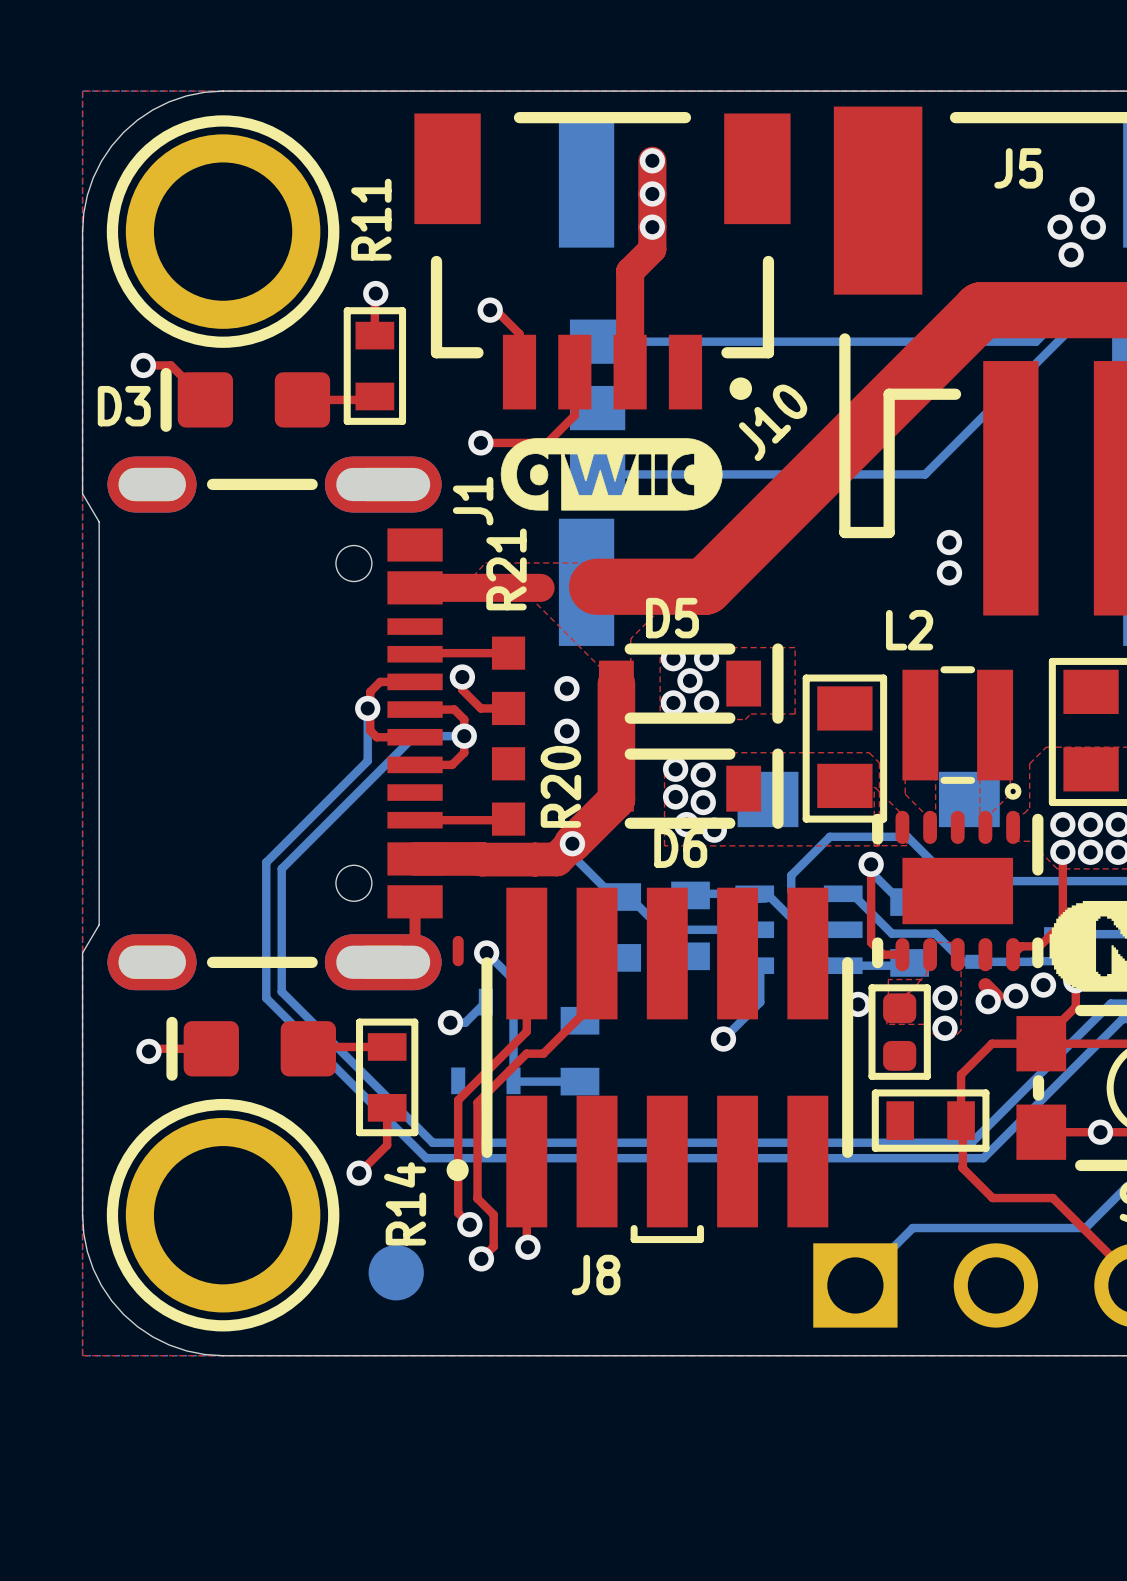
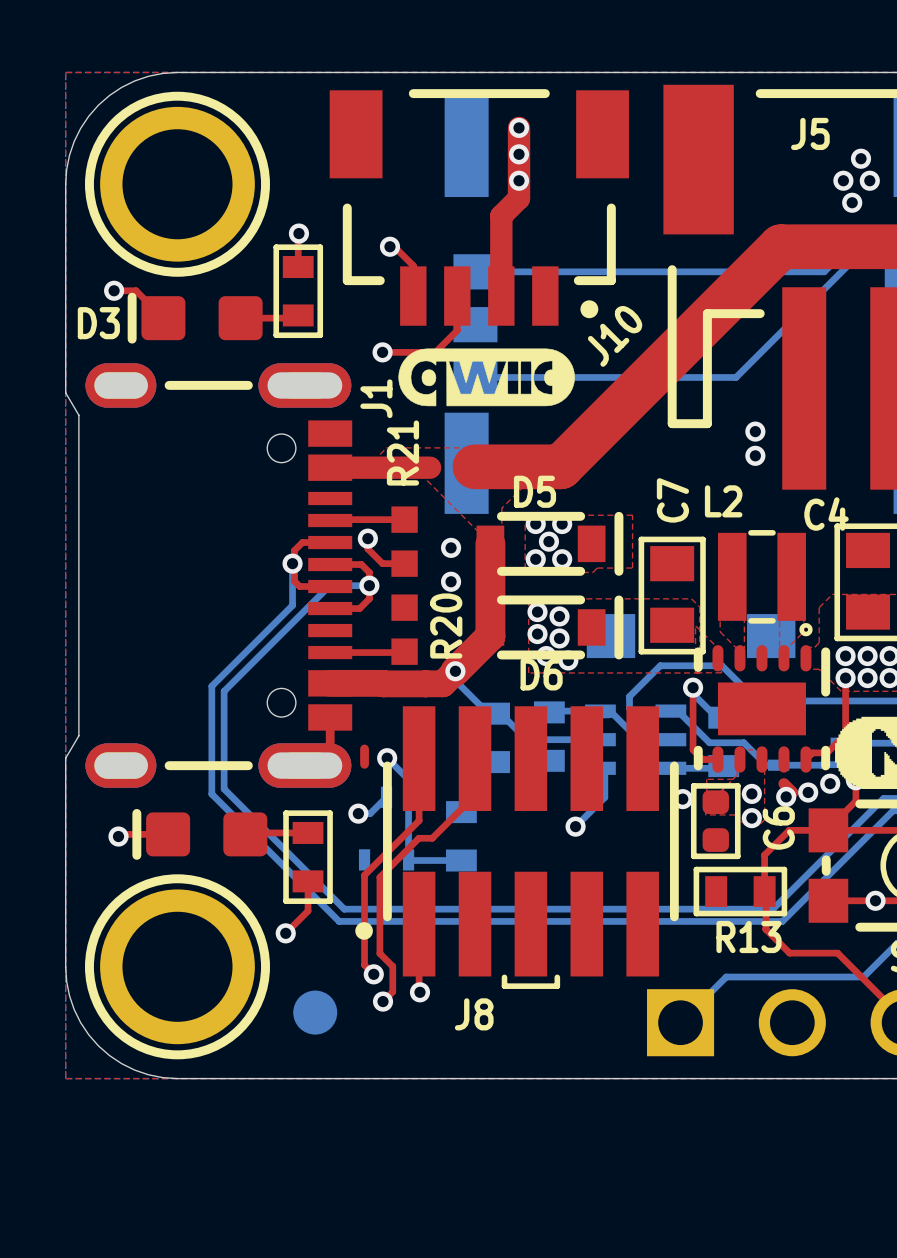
R11 name: R11 (371, 219) -> none
C7 name: none -> C7 (672, 500)
C4 name: none -> C4 (826, 514)
C6 name: none -> C6 (778, 828)
R13 name: none -> R13 (748, 937)
R14 name: R14 (405, 1203) -> none

